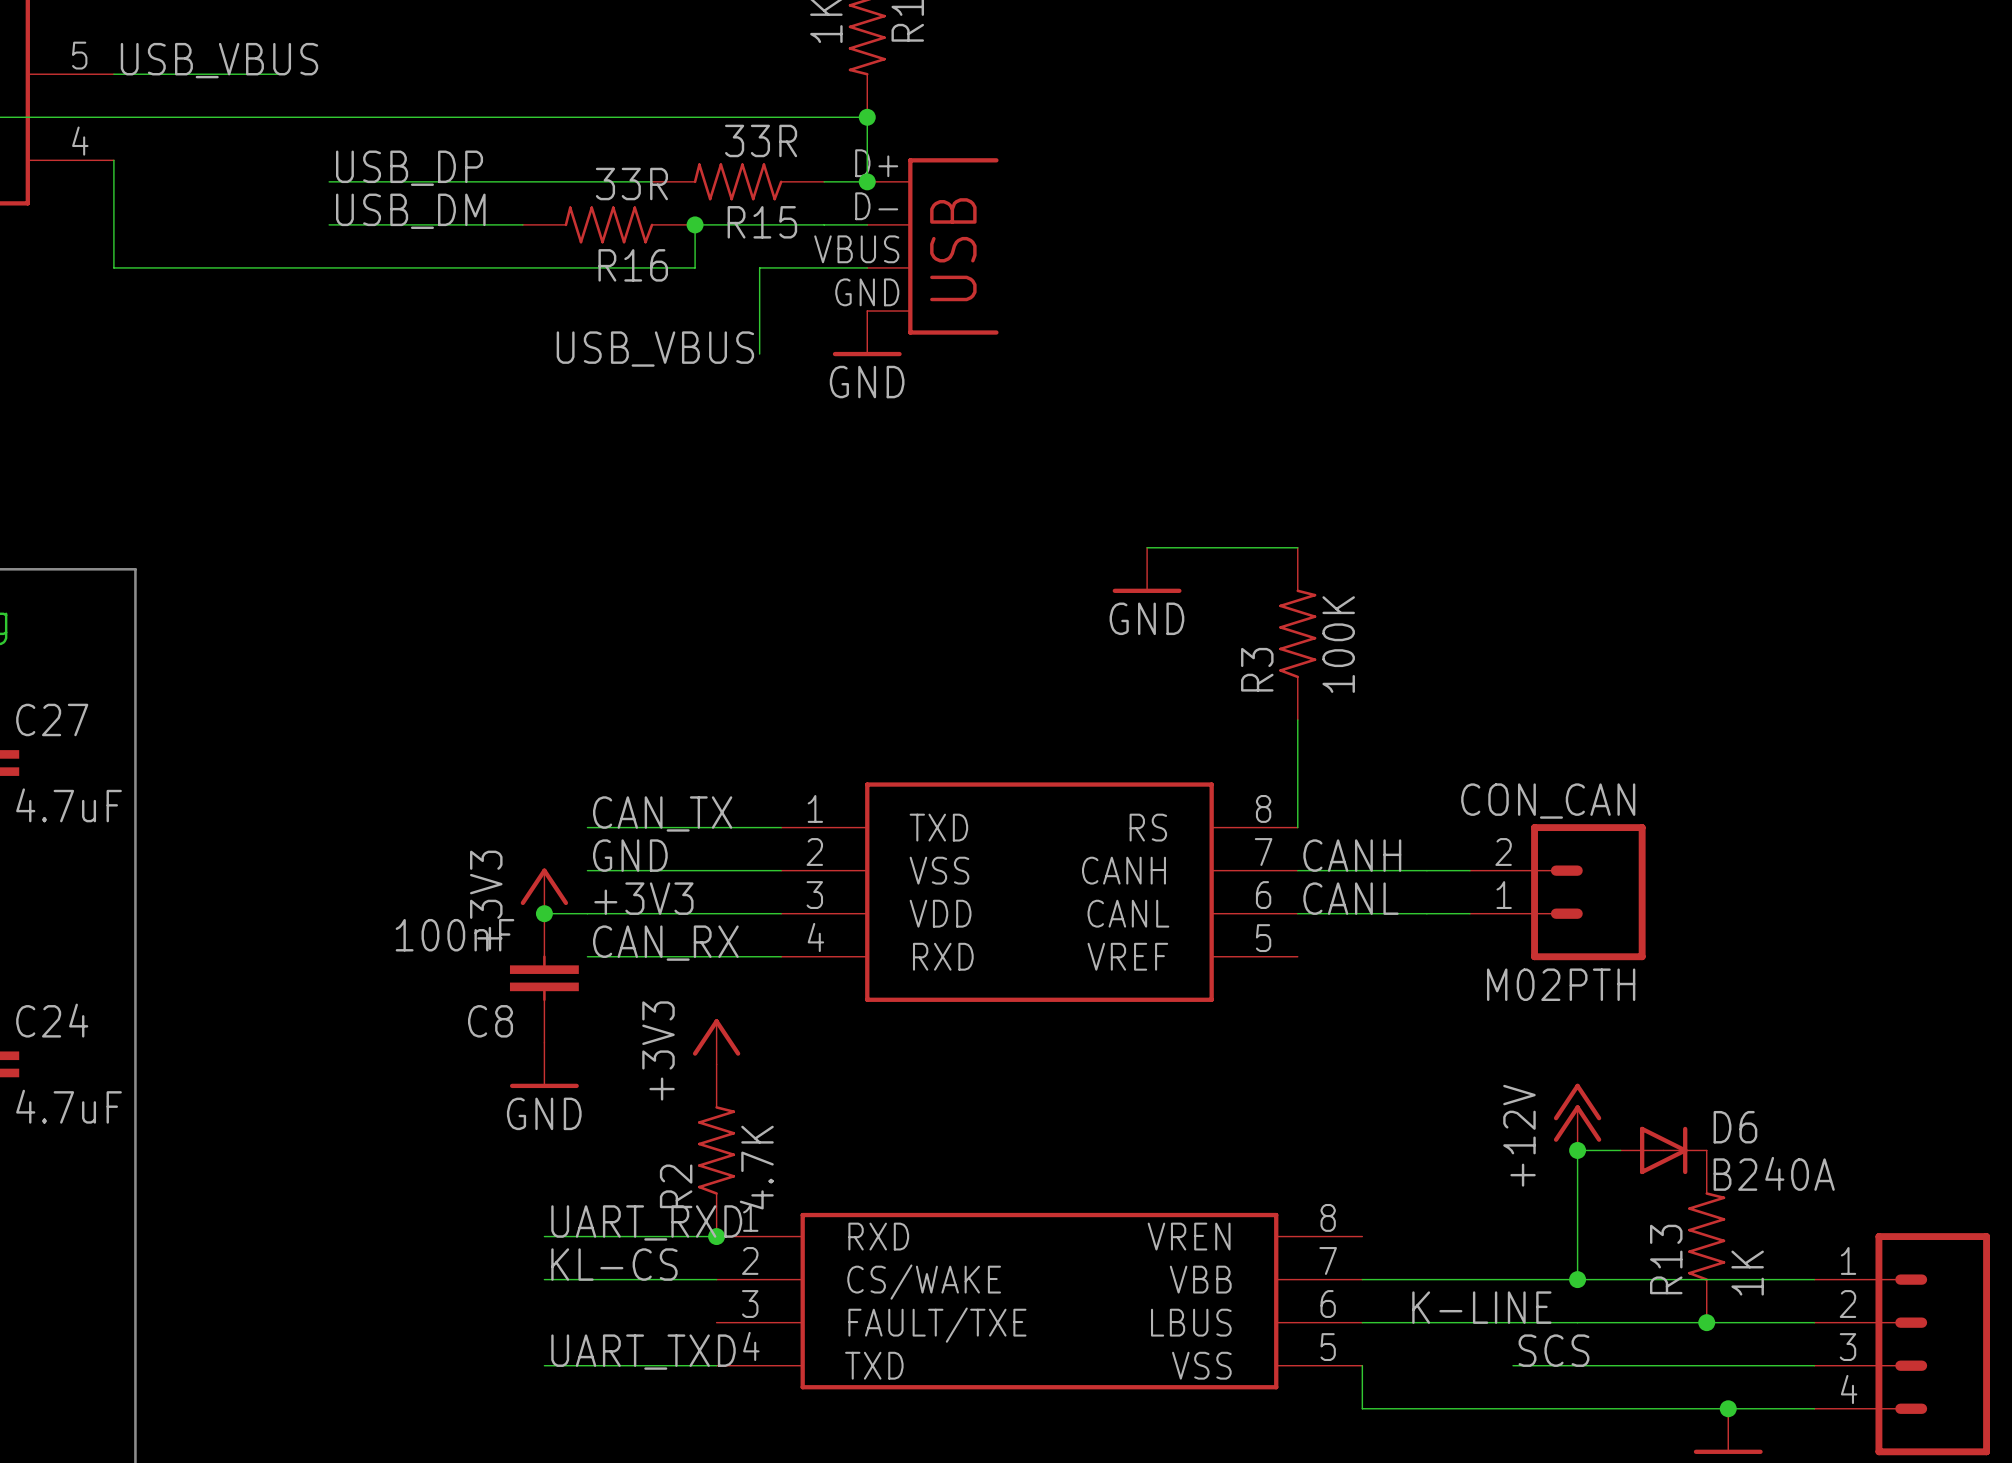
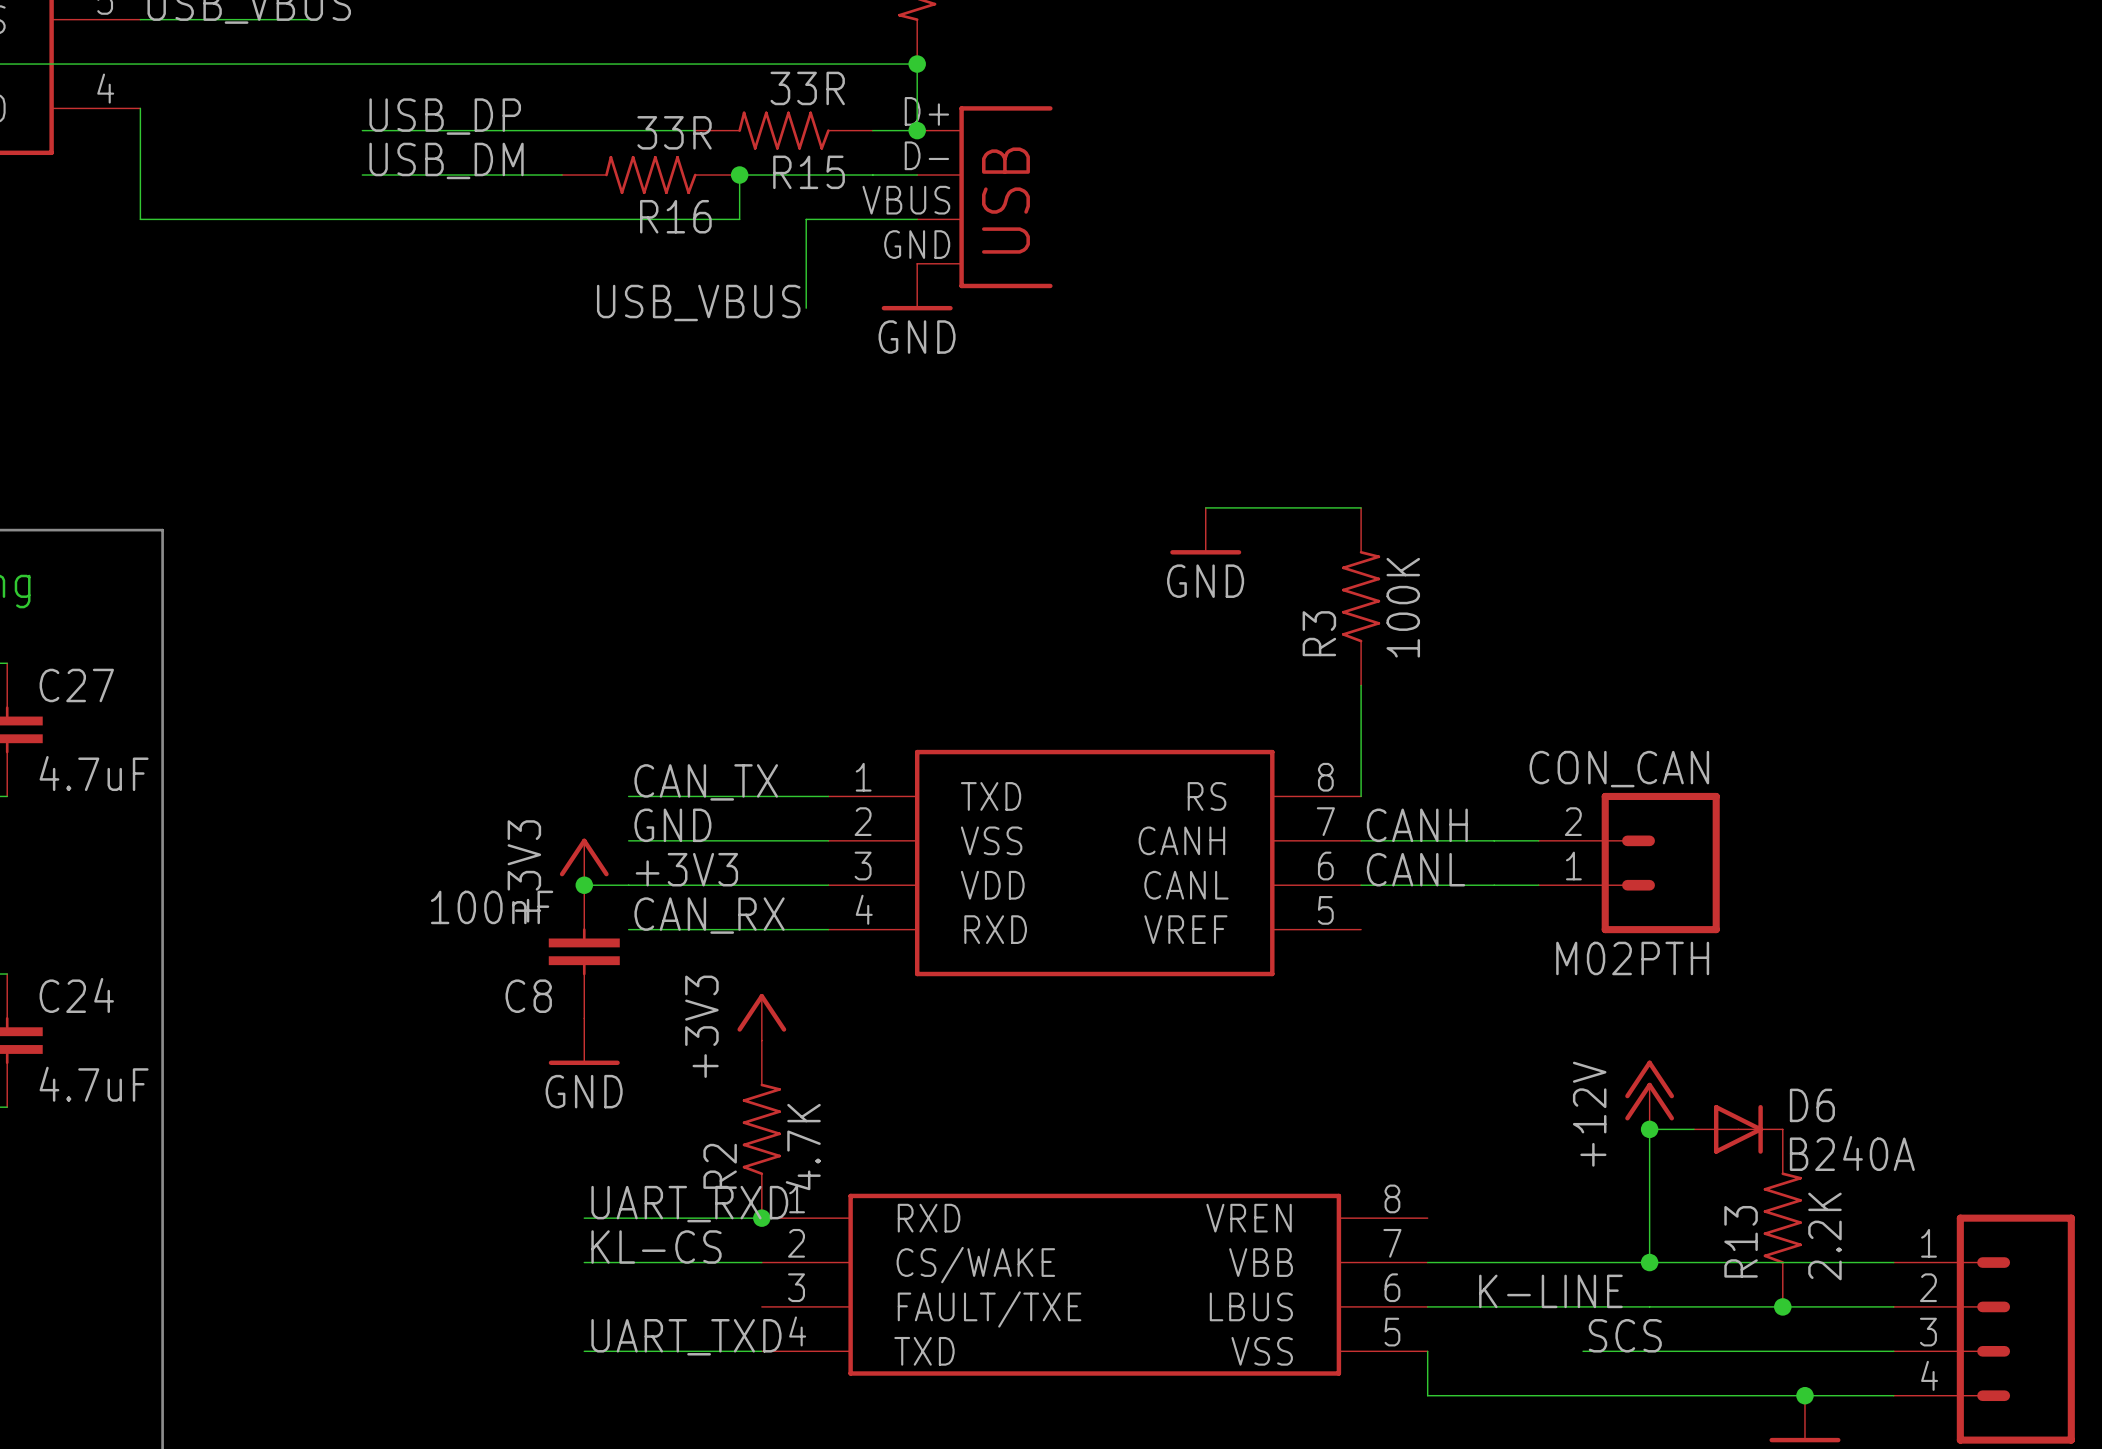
R13 value: 1K (1747, 1273) -> 2.2K (1824, 1236)

